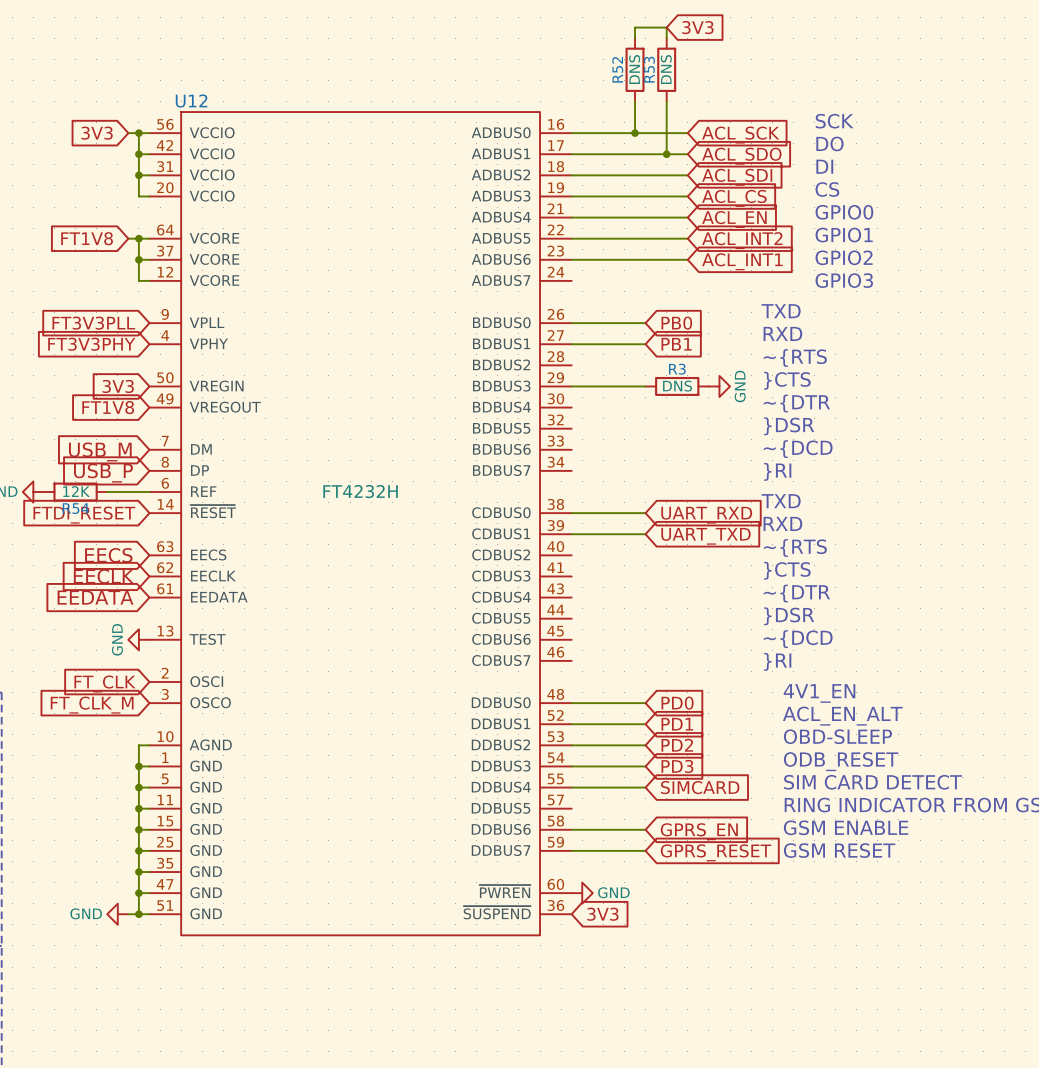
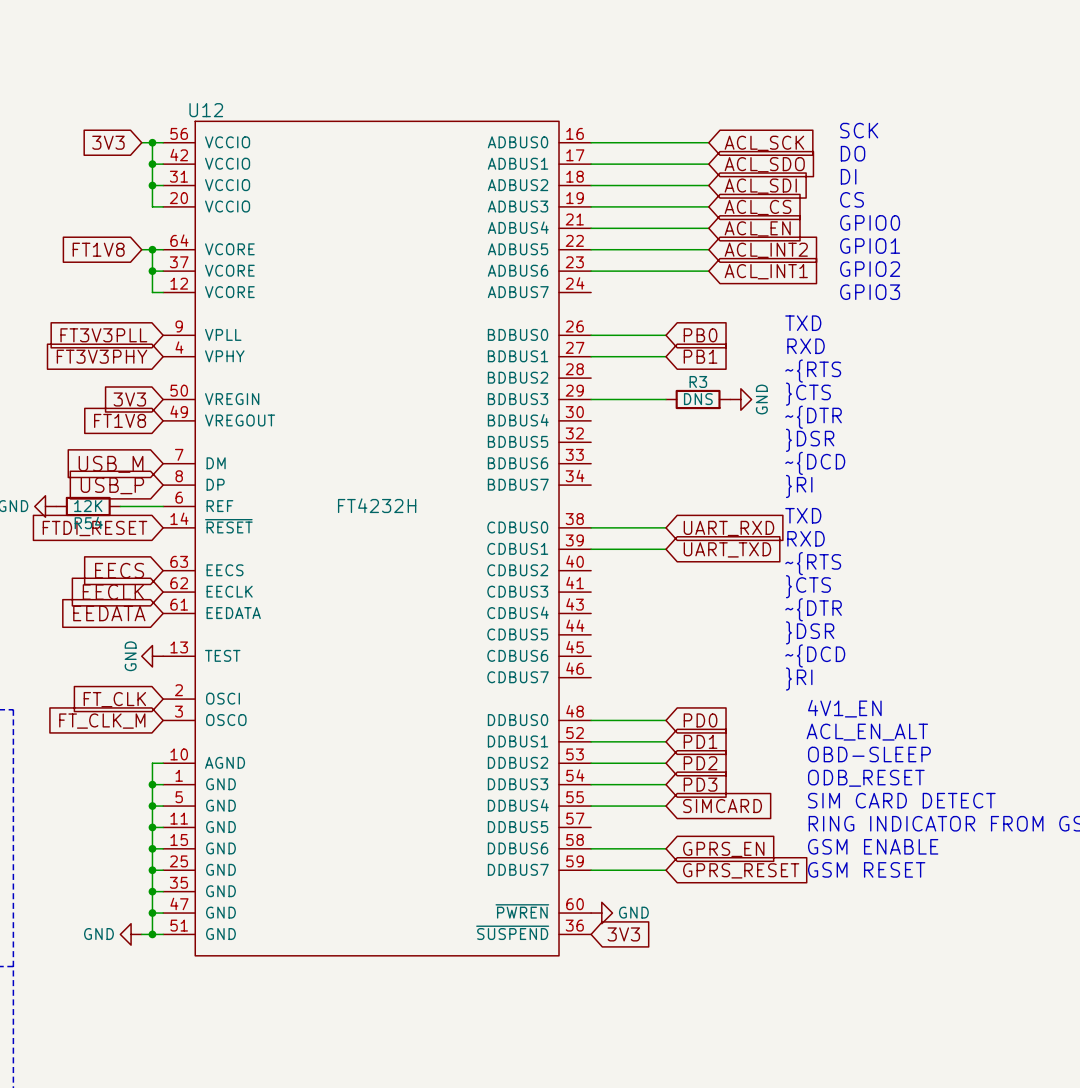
global label: 3V3 (697, 27) -> none
wire: (635, 38) (635, 27) (666, 27) (666, 38) -> none
R52: DNS (635, 69) -> none
R53: DNS (666, 69) -> none
wire: (635, 101) (635, 133) -> none
wire: (666, 101) (666, 154) -> none
junction: (635, 133) -> none
junction: (666, 154) -> none

